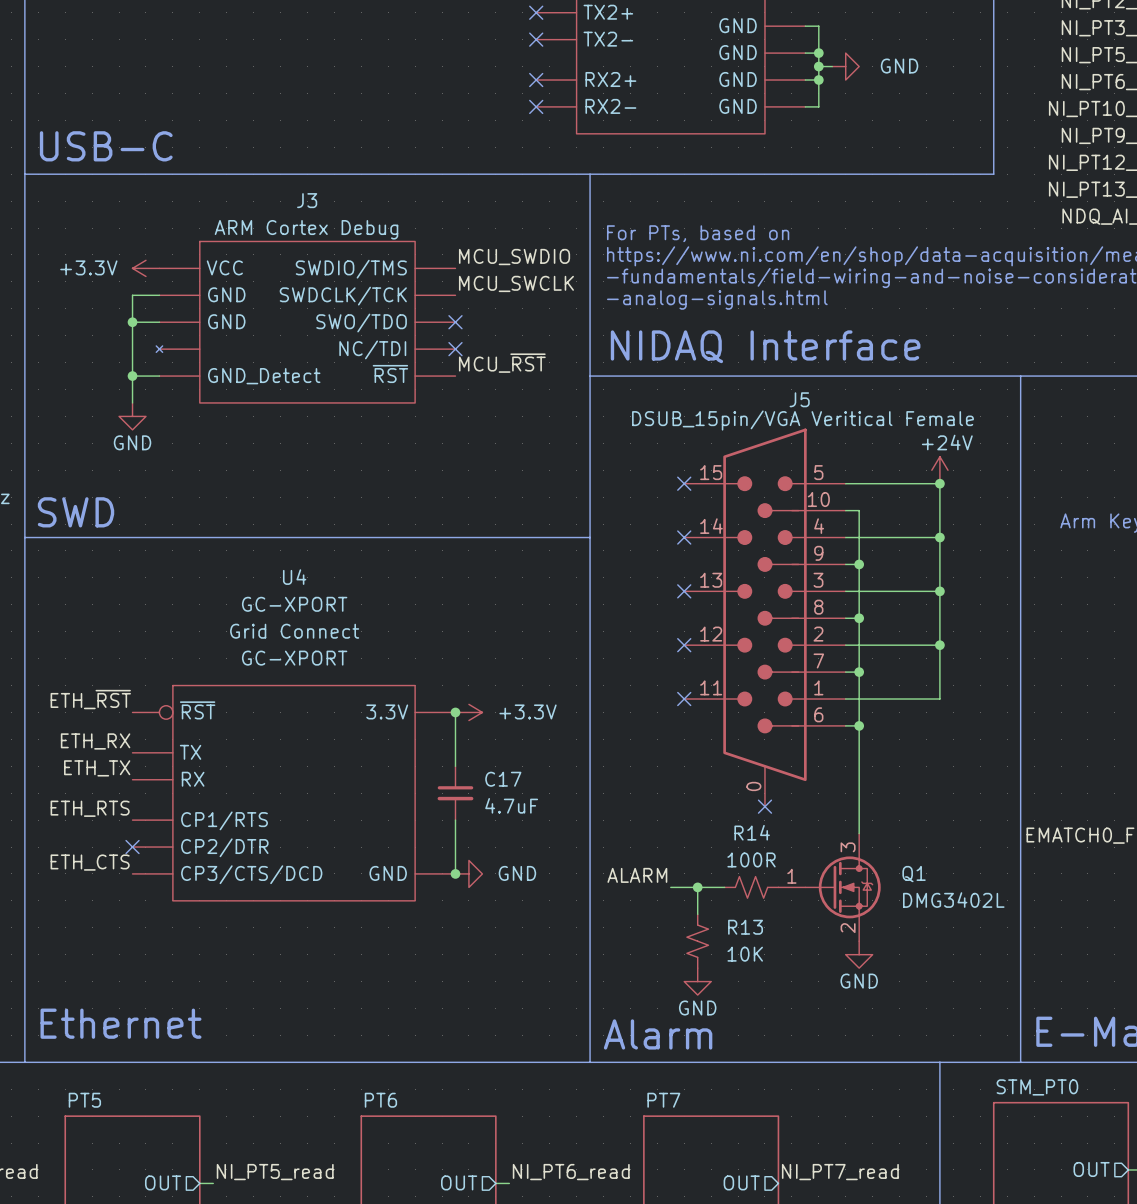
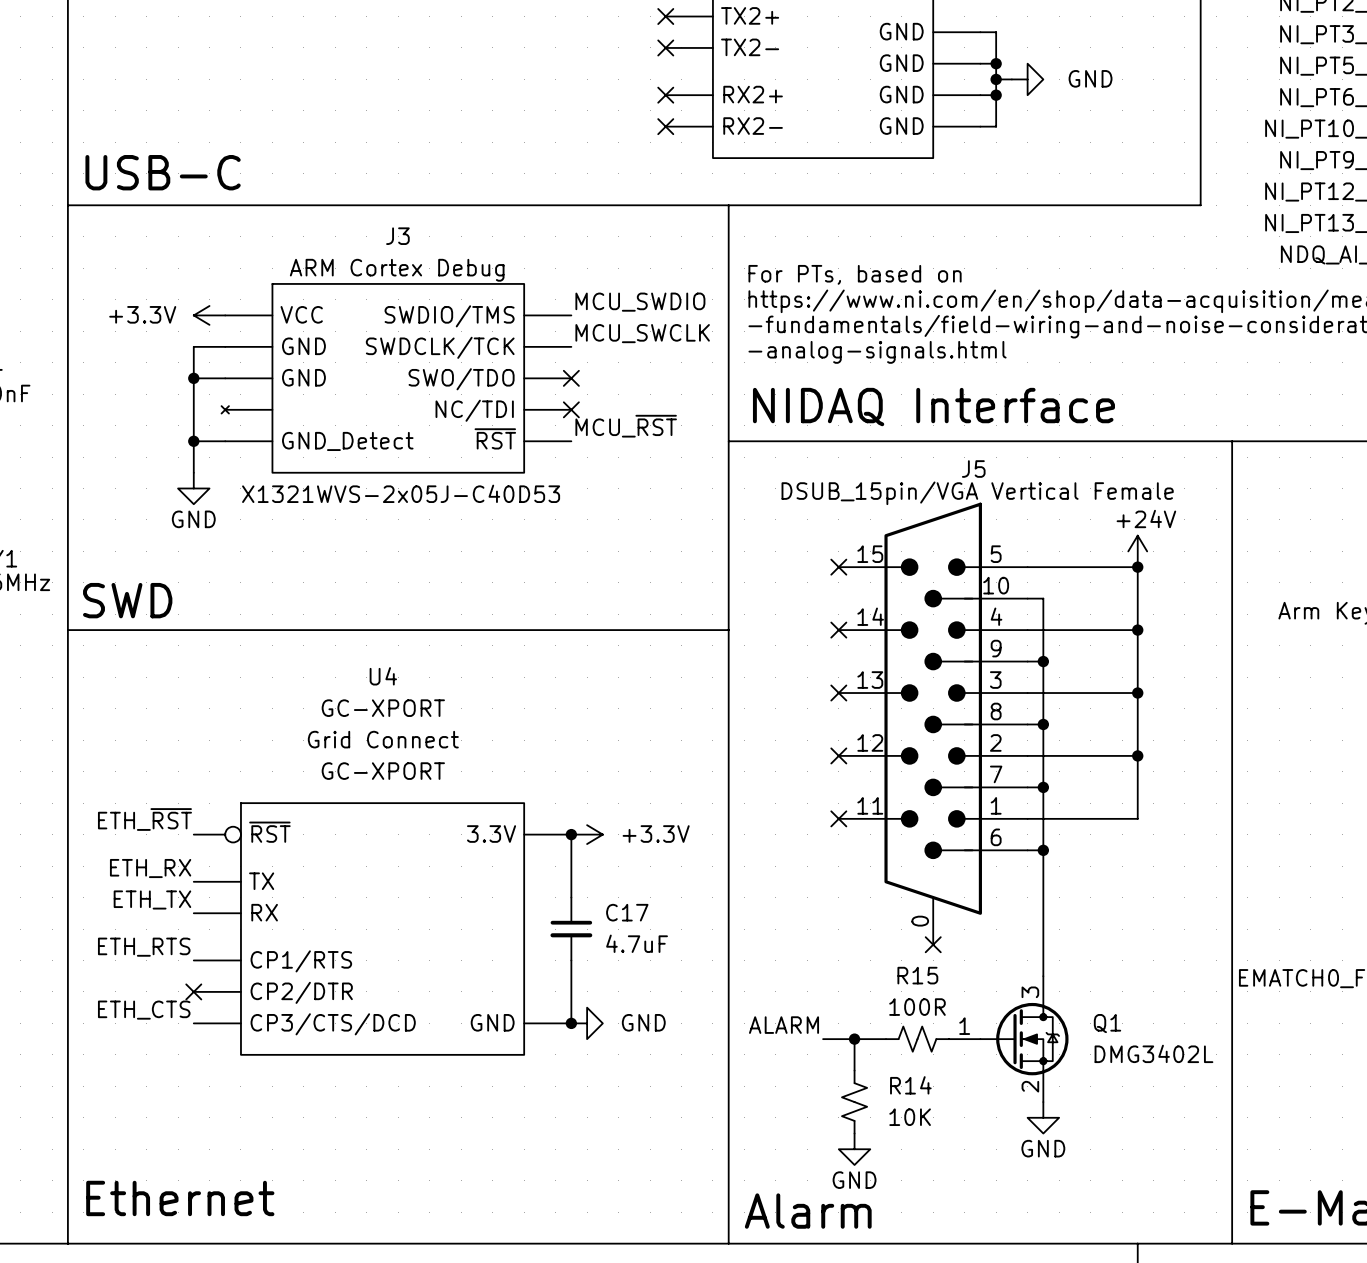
J3 text: none -> X1321WVS-2x05J-C40D53 (401, 493)
J5 value: DSUB_15pin/VGA Veritical Female (802, 420) -> DSUB_15pin/VGA Vertical Female (977, 493)
R14 name: R14 (752, 832) -> R15 (917, 975)
R13 name: R13 (745, 927) -> R14 (910, 1085)

